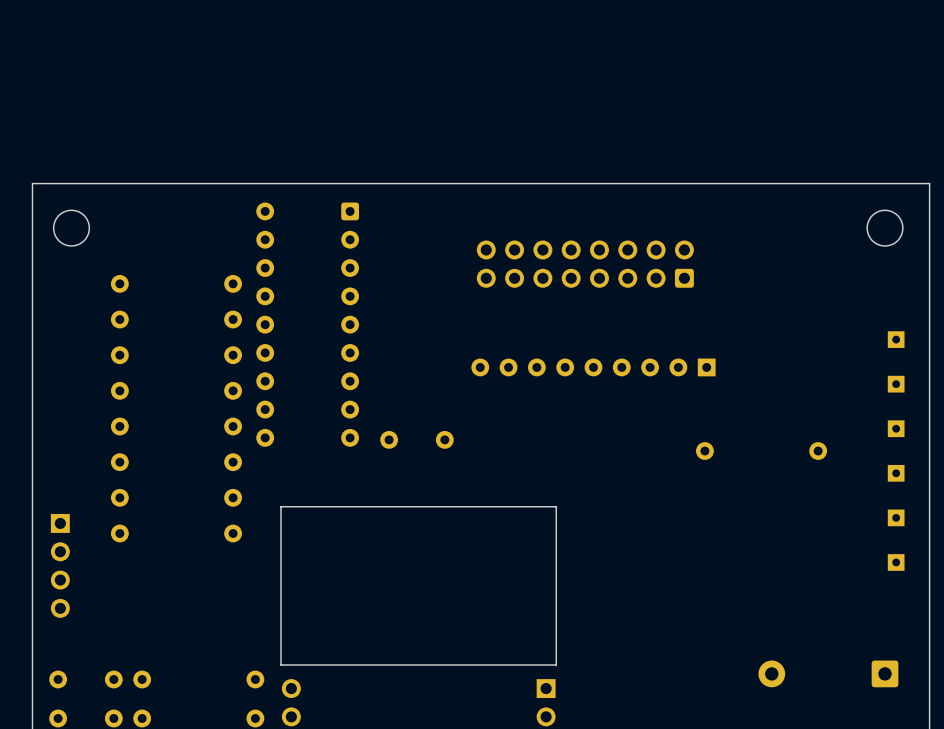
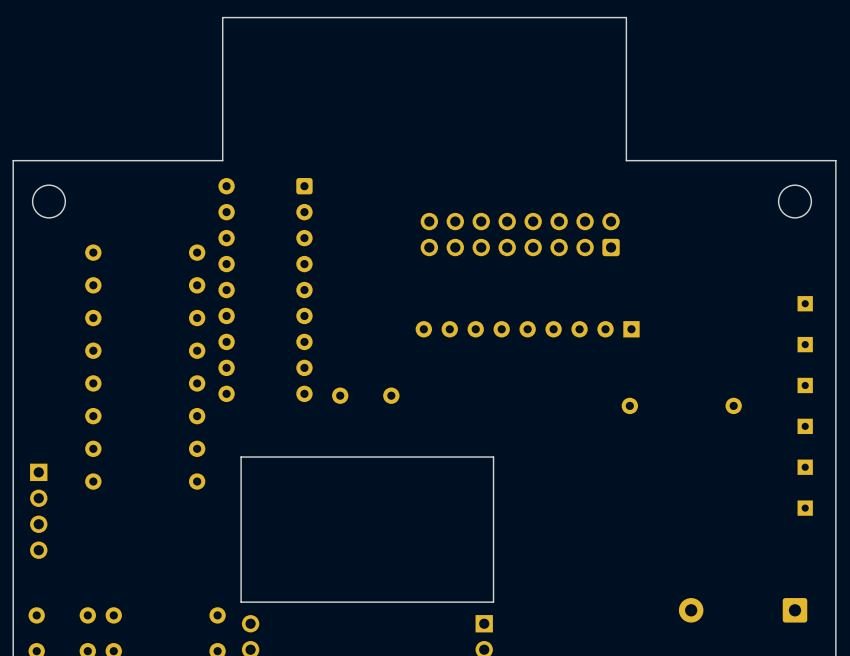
board edge: (701, 183) (260, 183) -> (626, 160) (626, 17) (222, 17) (222, 160)

